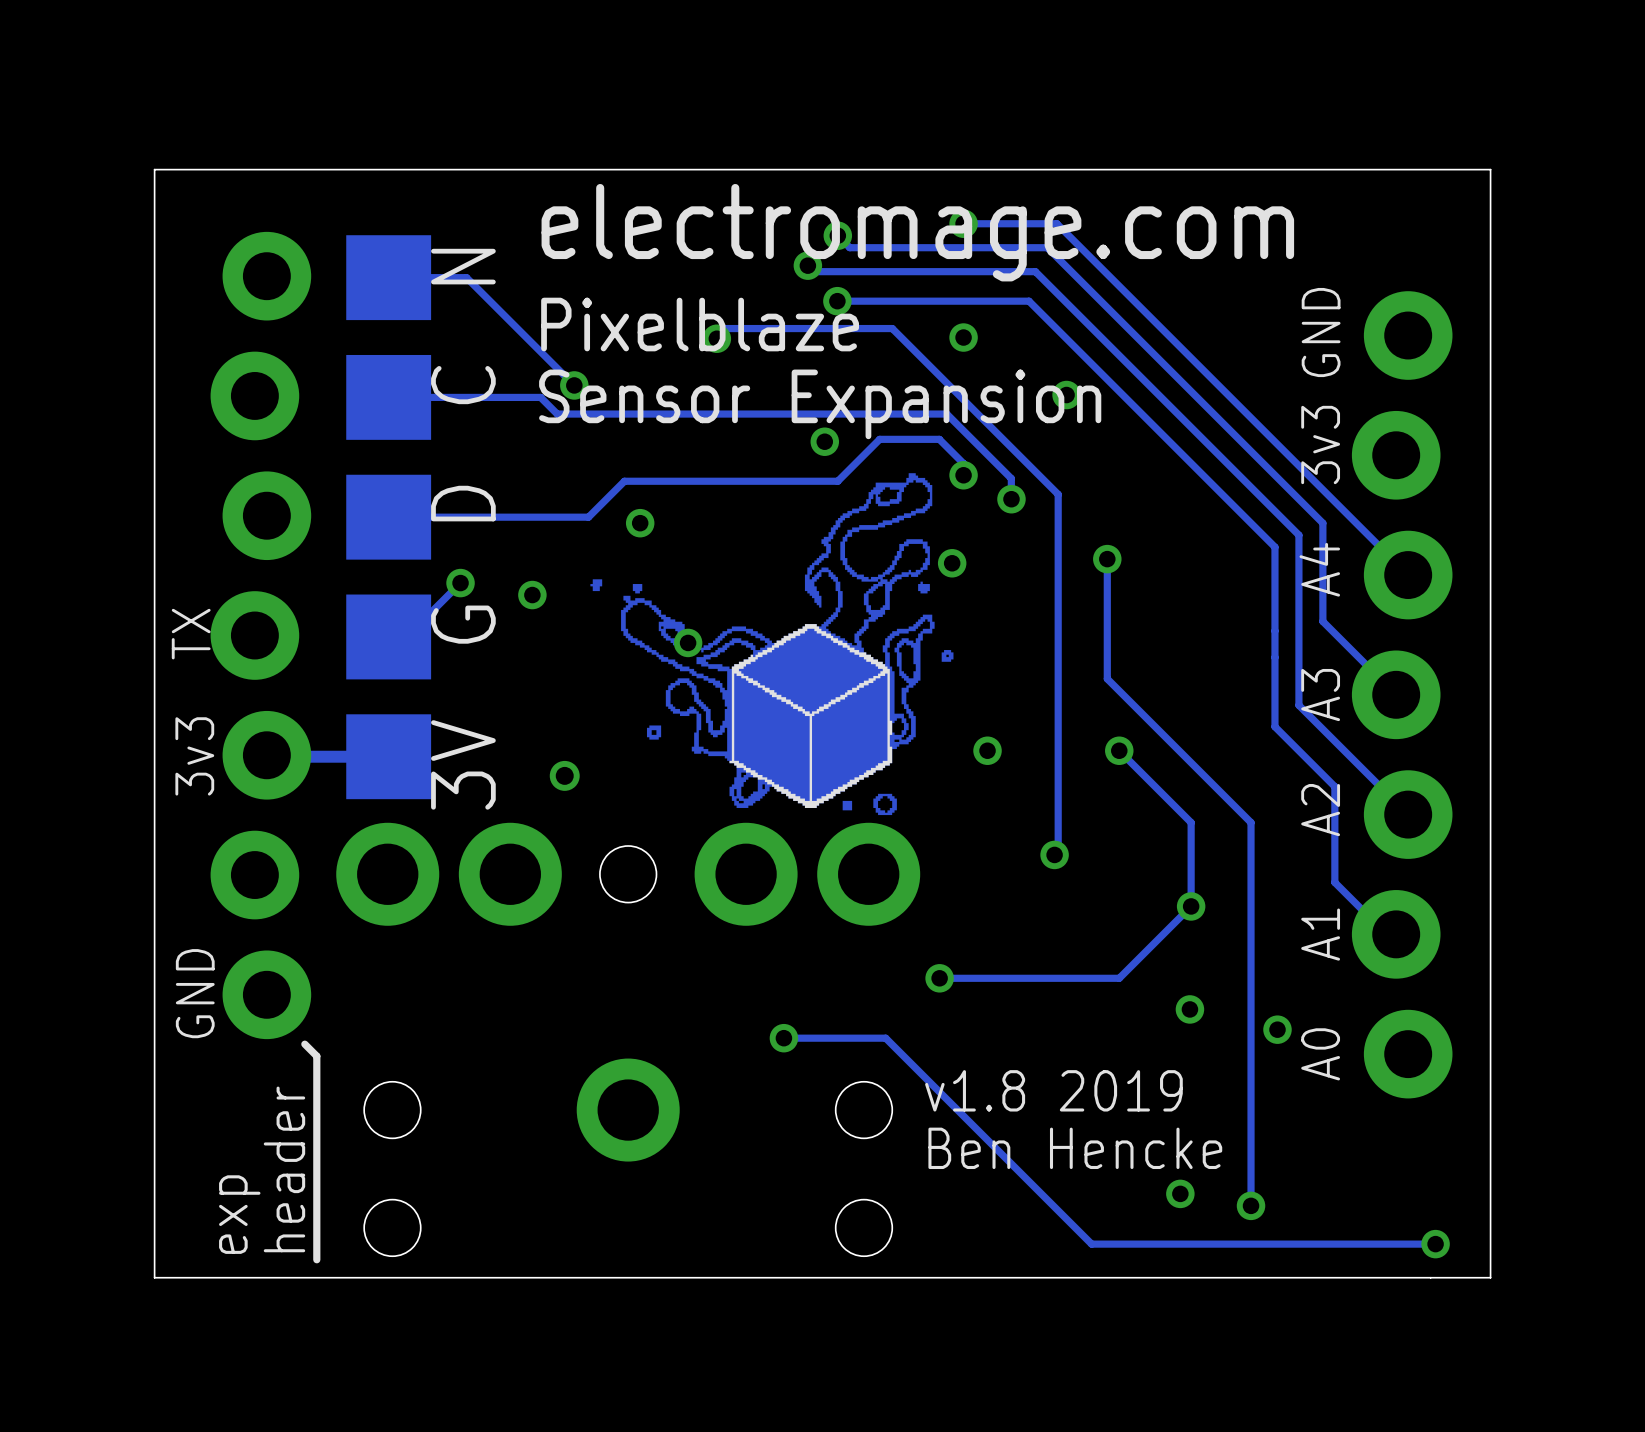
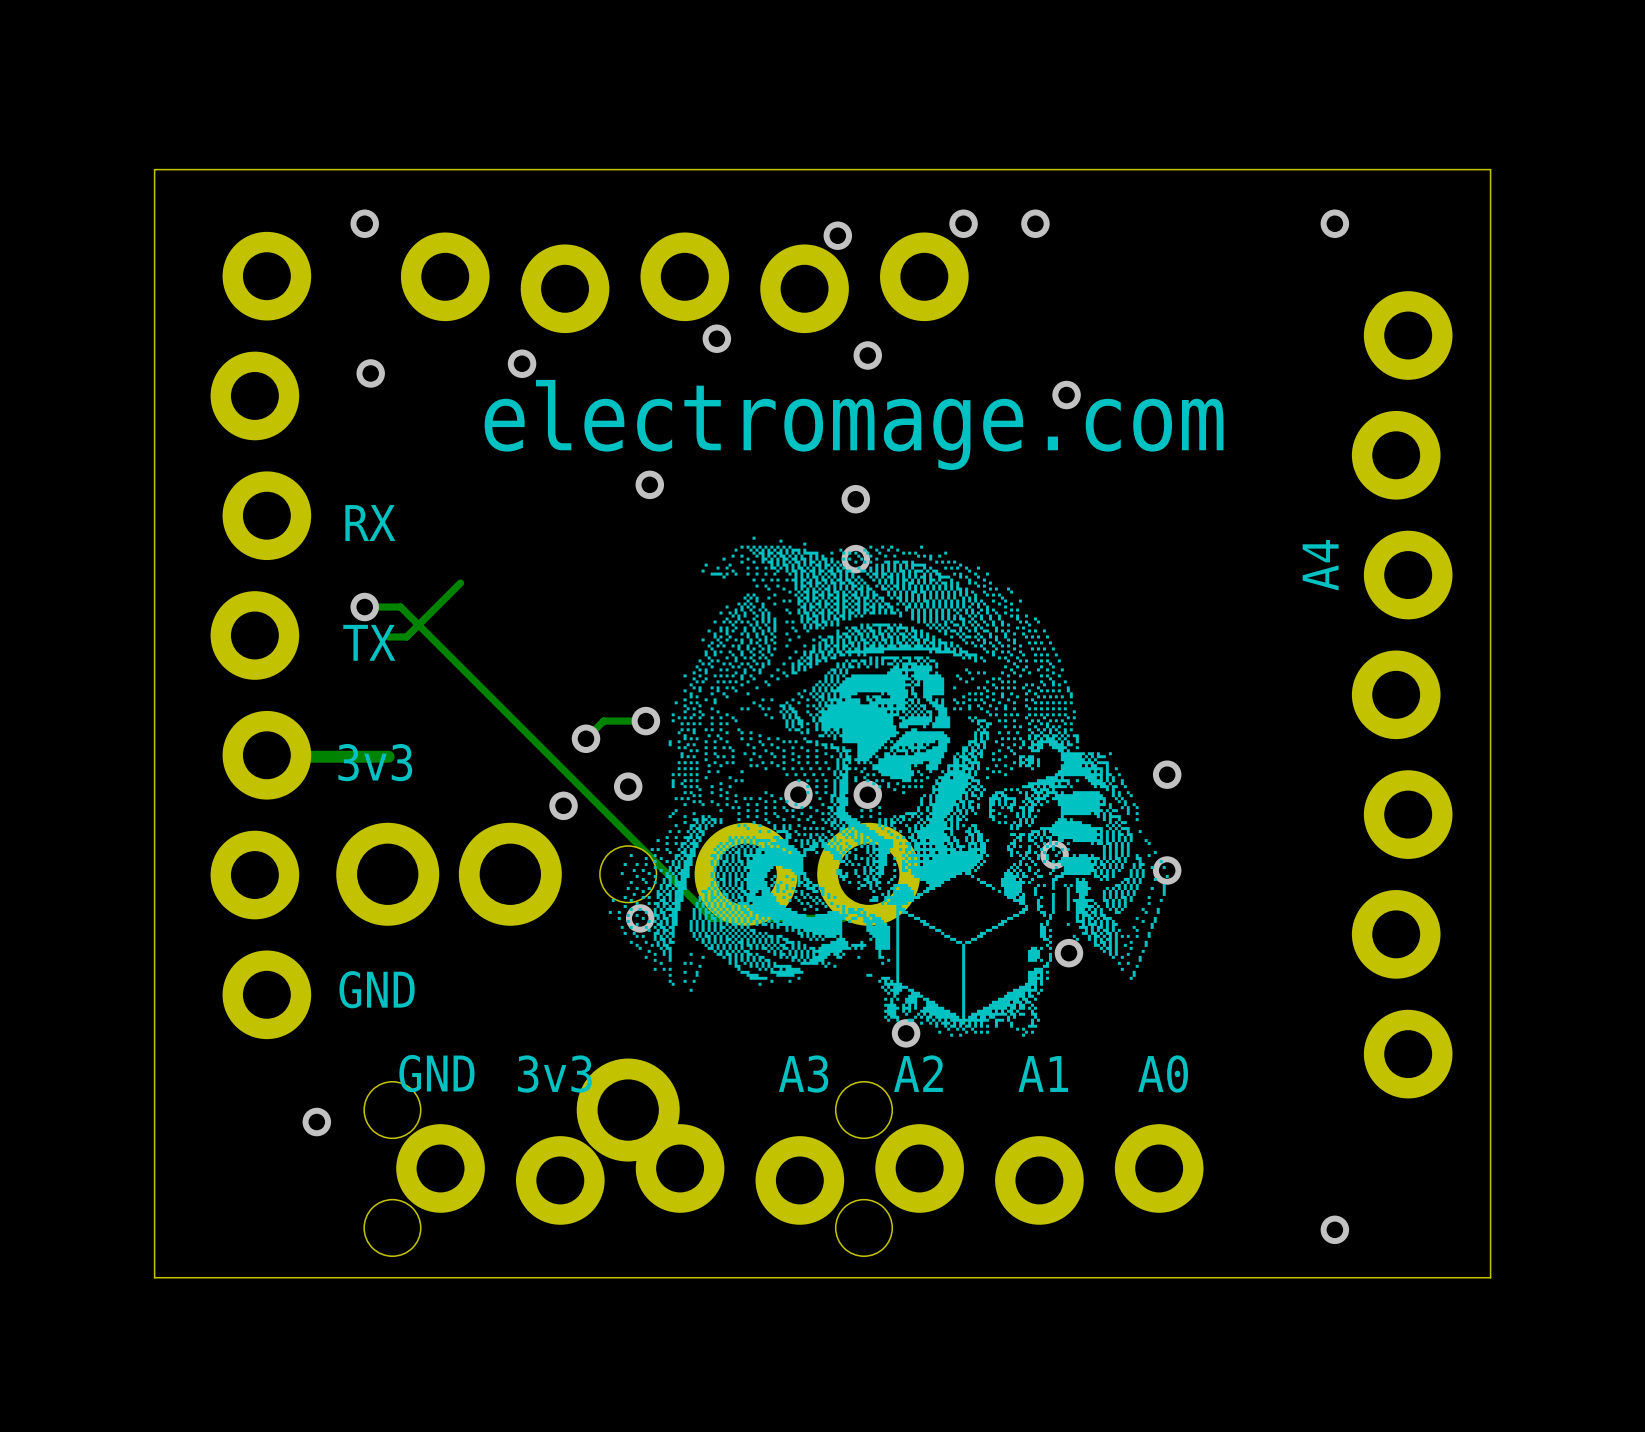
via: none -> (364, 223)
track: (963, 223) (1056, 223) (1408, 575) -> none
via: none -> (1035, 223)
via: none -> (1334, 223)
text position: electromage.com (917, 232) -> electromage.com (854, 424)
track: (837, 235) (849, 247) (1047, 247) (1322, 523) (1322, 621) (1396, 694) -> none
track: (807, 265) (813, 271) (1035, 271) (1298, 535) (1298, 705) (1408, 814) -> none
via: (807, 265) -> none
track: (388, 277) (466, 277) (574, 385) -> none
N: (388, 277) -> none
part: none -> (684, 282)
track: (837, 301) (1029, 301) (1274, 547) (1274, 726) (1334, 786) (1334, 882) (1386, 934) (1396, 934) -> none
via: (837, 301) -> none
text: Pixelblaze (700, 324) -> none
text: GND (1321, 332) -> none
via: (963, 337) -> none
track: (716, 338) (727, 328) (892, 328) (1058, 494) (1058, 851) (1054, 854) -> none
via: none -> (867, 355)
via: none -> (370, 373)
via position: (574, 385) -> (522, 363)
track: (388, 397) (540, 397) (557, 414) (946, 414) (1011, 478) (1011, 499) -> none
C: (388, 397) -> none
text: Sensor Expansion (820, 404) -> none
via: (824, 441) -> none
text: 3v3 (1320, 445) -> none
drawing: [590, 473, 954, 816] -> none
track: (963, 475) (963, 463) (939, 439) (879, 439) (837, 481) (624, 481) (588, 517) (388, 517) -> none
via: (963, 475) -> none
via: none -> (855, 499)
via: (1011, 499) -> none
D: (388, 517) -> none
text: none -> RX (370, 523)
via position: (640, 523) -> (649, 484)
drawing: none -> [608, 536, 1169, 1037]
via: none -> (855, 559)
track: (1107, 559) (1107, 678) (1251, 822) (1251, 1205) -> none
via: (1107, 559) -> none
via: (952, 563) -> none
via: (460, 583) -> none
via: (532, 595) -> none
track: none -> (364, 607) (400, 607) (712, 918) (843, 918)
via: none -> (364, 607)
text rotation: 0° (191, 634) -> 90° clockwise (369, 642)
text position: TX (191, 634) -> TX (369, 642)
G: (388, 636) -> none
via: (688, 642) -> none
text rotation: 0° (1320, 695) -> 90° clockwise (803, 1074)
text position: A3 (1320, 695) -> A3 (803, 1074)
track: none -> (645, 721) (603, 721) (586, 738)
via: none -> (645, 721)
via: none -> (586, 738)
via: (987, 750) -> none
track: (1119, 750) (1191, 822) (1191, 906) (1119, 978) (939, 978) -> none
via position: (1119, 750) -> (1167, 774)
text rotation: 0° (194, 756) -> 90° clockwise (375, 762)
text position: 3v3 (194, 756) -> 3v3 (375, 762)
3V: (388, 756) -> none
via: (564, 775) -> none
via: none -> (628, 786)
via: none -> (798, 794)
via: none -> (867, 794)
via: none -> (563, 805)
text rotation: 0° (1320, 810) -> 90° clockwise (918, 1073)
text position: A2 (1320, 810) -> A2 (918, 1073)
via position: (1191, 906) -> (1167, 870)
via: none -> (640, 918)
text rotation: 0° (1320, 934) -> 90° clockwise (1043, 1073)
text position: A1 (1320, 934) -> A1 (1043, 1073)
via: none -> (1068, 953)
via: (939, 978) -> none
text: none -> GND (377, 989)
text: GND (195, 993) -> none
via: (1189, 1009) -> none
via: (1277, 1029) -> none
via: none -> (906, 1033)
track: (783, 1038) (885, 1038) (1091, 1244) (1435, 1244) -> none
via: (783, 1038) -> none
line: (304, 1044) (316, 1056) (316, 1259) -> none
text rotation: 0° (1320, 1054) -> 90° clockwise (1163, 1074)
text position: A0 (1320, 1054) -> A0 (1163, 1074)
text: none -> GND (436, 1073)
text: none -> 3v3 (554, 1074)
text: v1.8 2019 (1053, 1090) -> none
via: none -> (316, 1122)
text: Ben Hencke (1075, 1148) -> none
text: header (284, 1169) -> none
part: none -> (799, 1174)
via: (1180, 1193) -> none
via: (1251, 1205) -> none
text: exp (239, 1214) -> none
via: none -> (1334, 1229)
via: (1435, 1244) -> none

